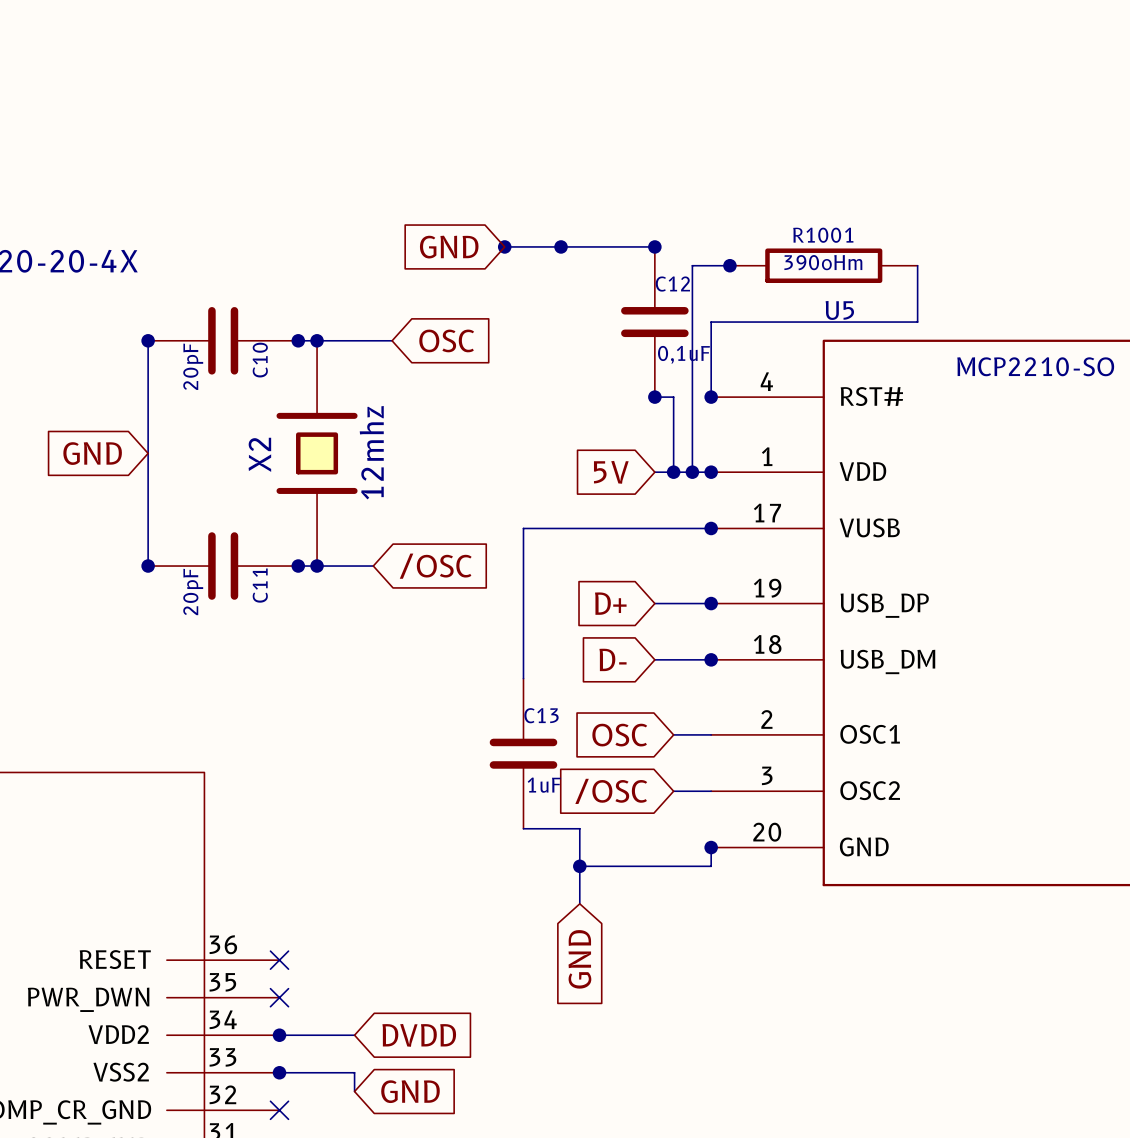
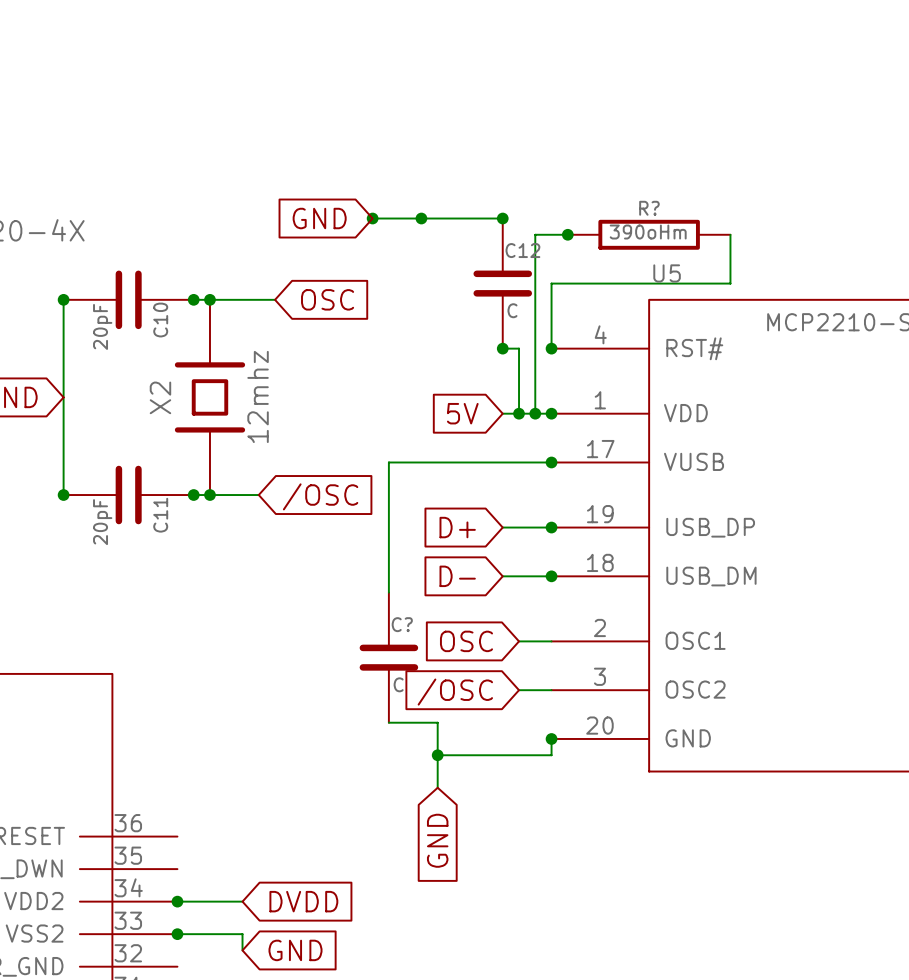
R1001 name: R1001 (823, 235) -> R? (649, 208)
C12 value: 0,1uF (683, 354) -> C (512, 310)
C13 name: C13 (541, 715) -> C? (402, 624)
C13 value: 1uF (544, 785) -> C (398, 684)
no-connect mark: (279, 960) -> none
no-connect mark: (279, 997) -> none
no-connect mark: (279, 1110) -> none

